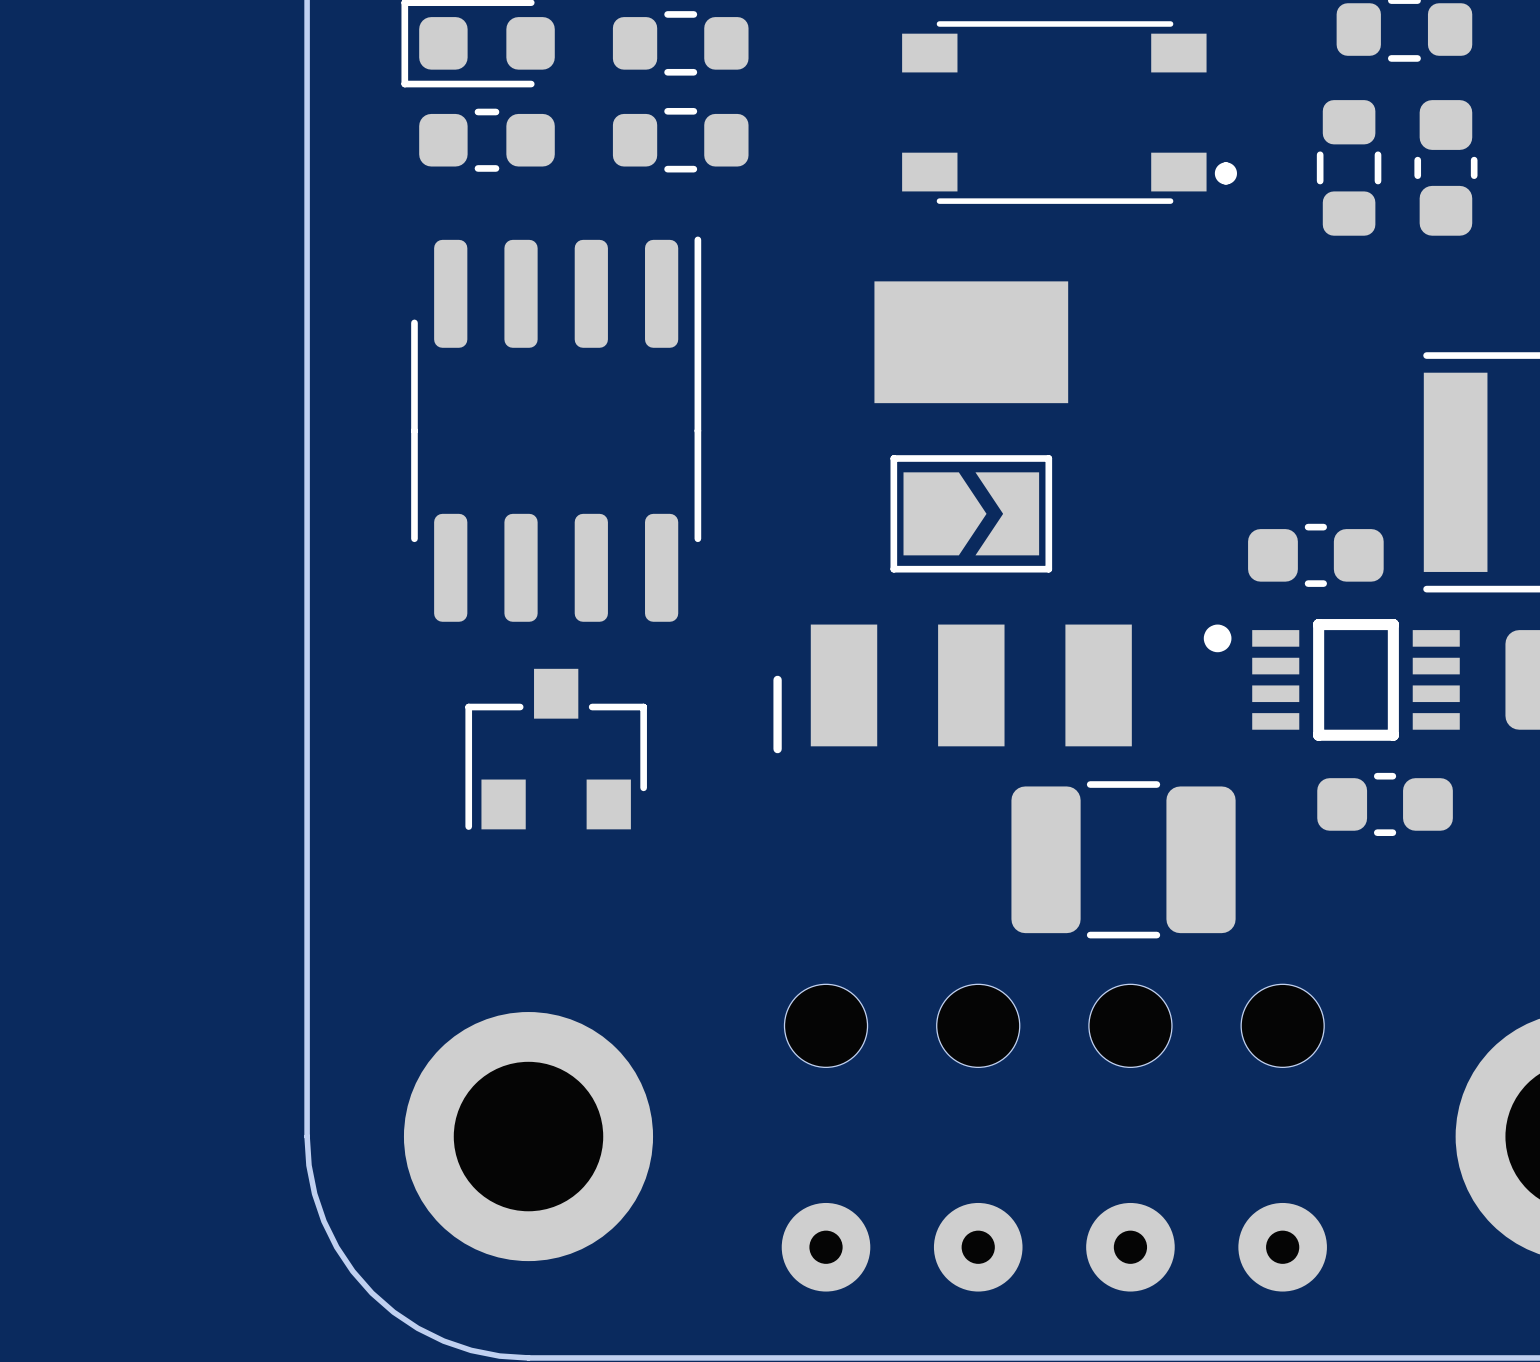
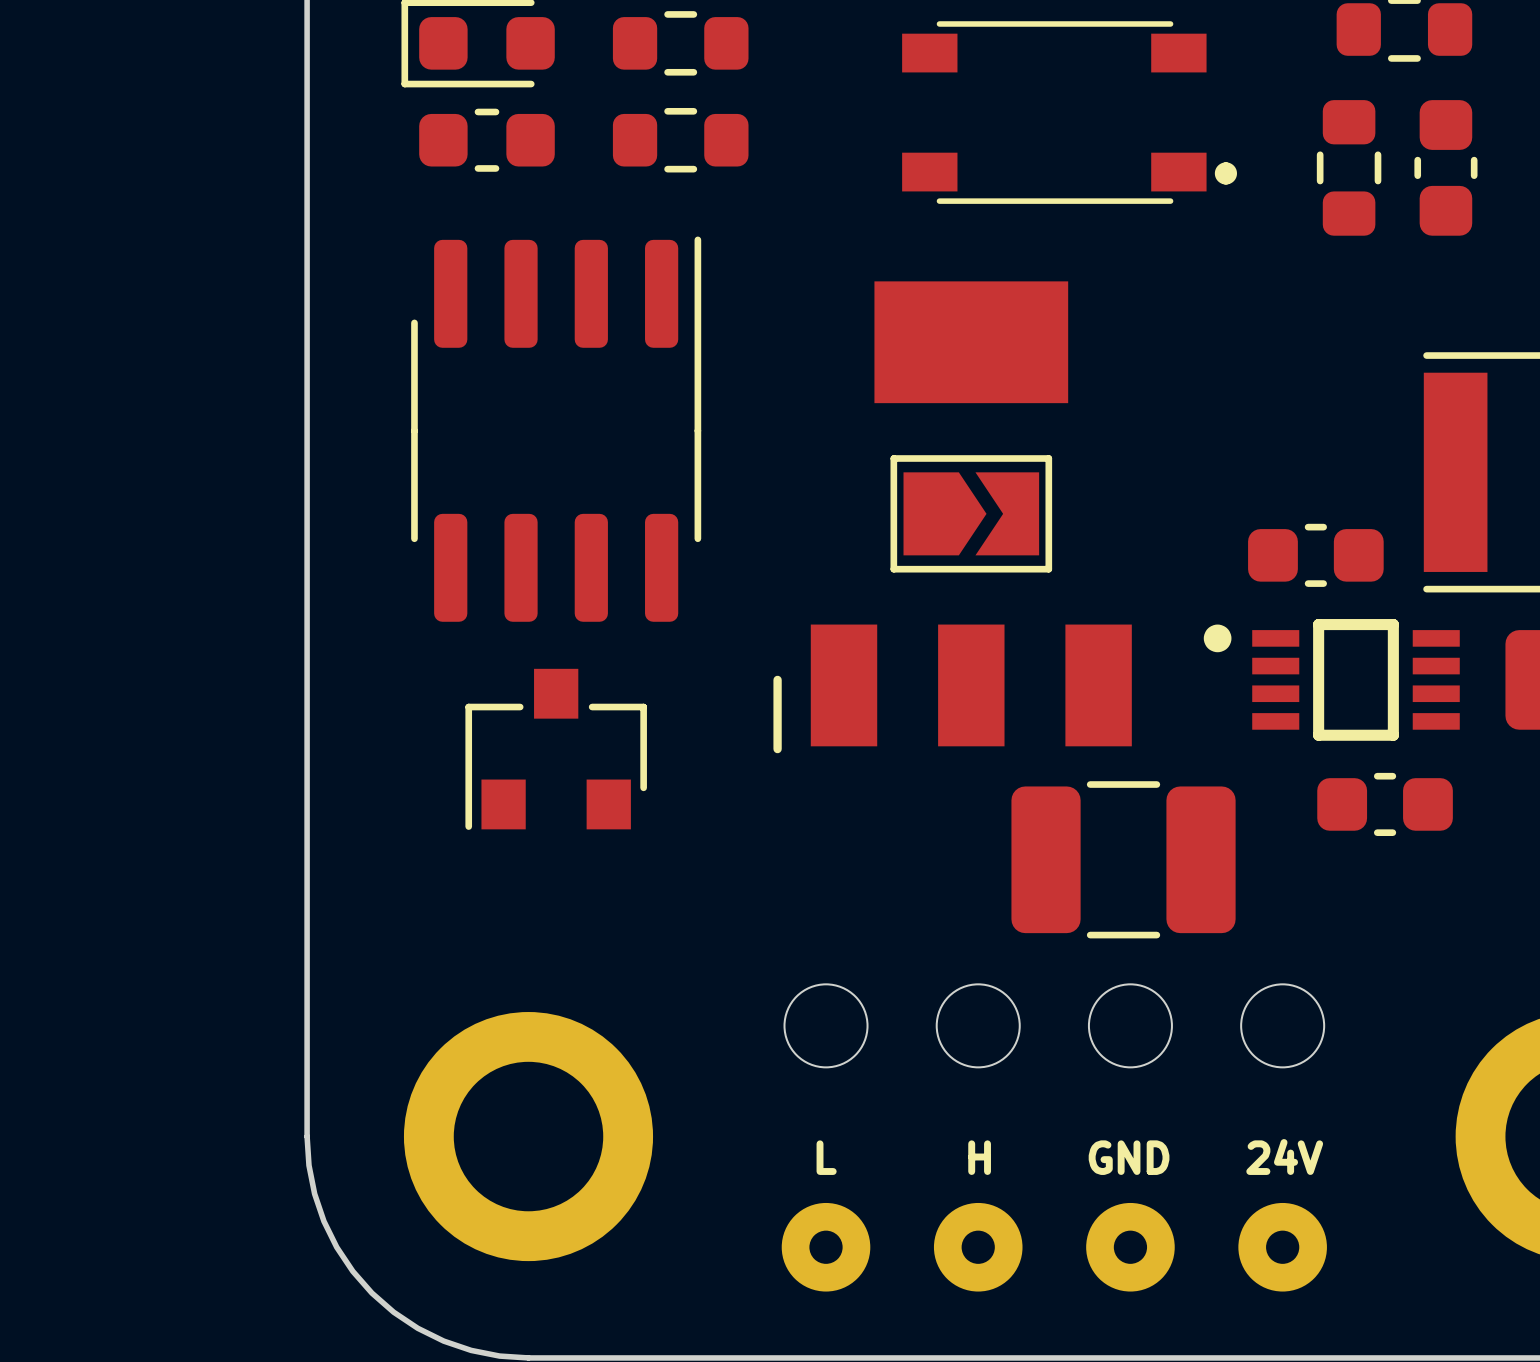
text: none -> L (826, 1157)
text: none -> H (979, 1157)
text: none -> GND (1129, 1157)
text: none -> 24V (1284, 1157)

